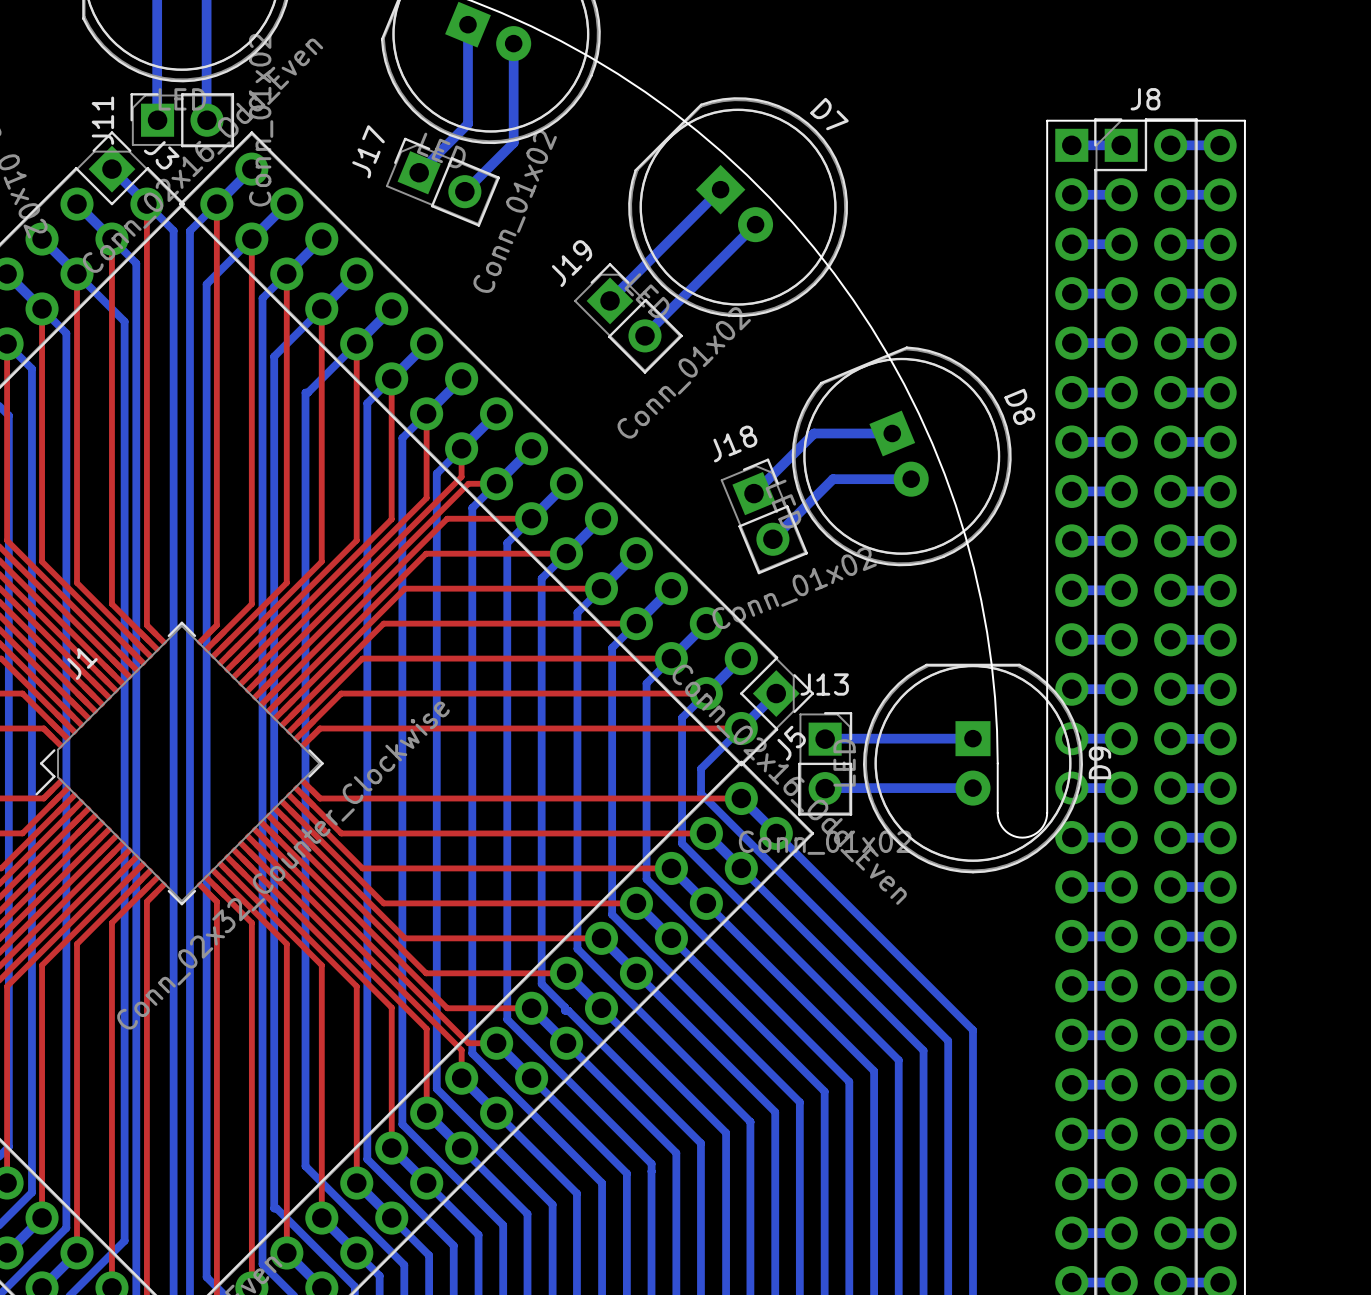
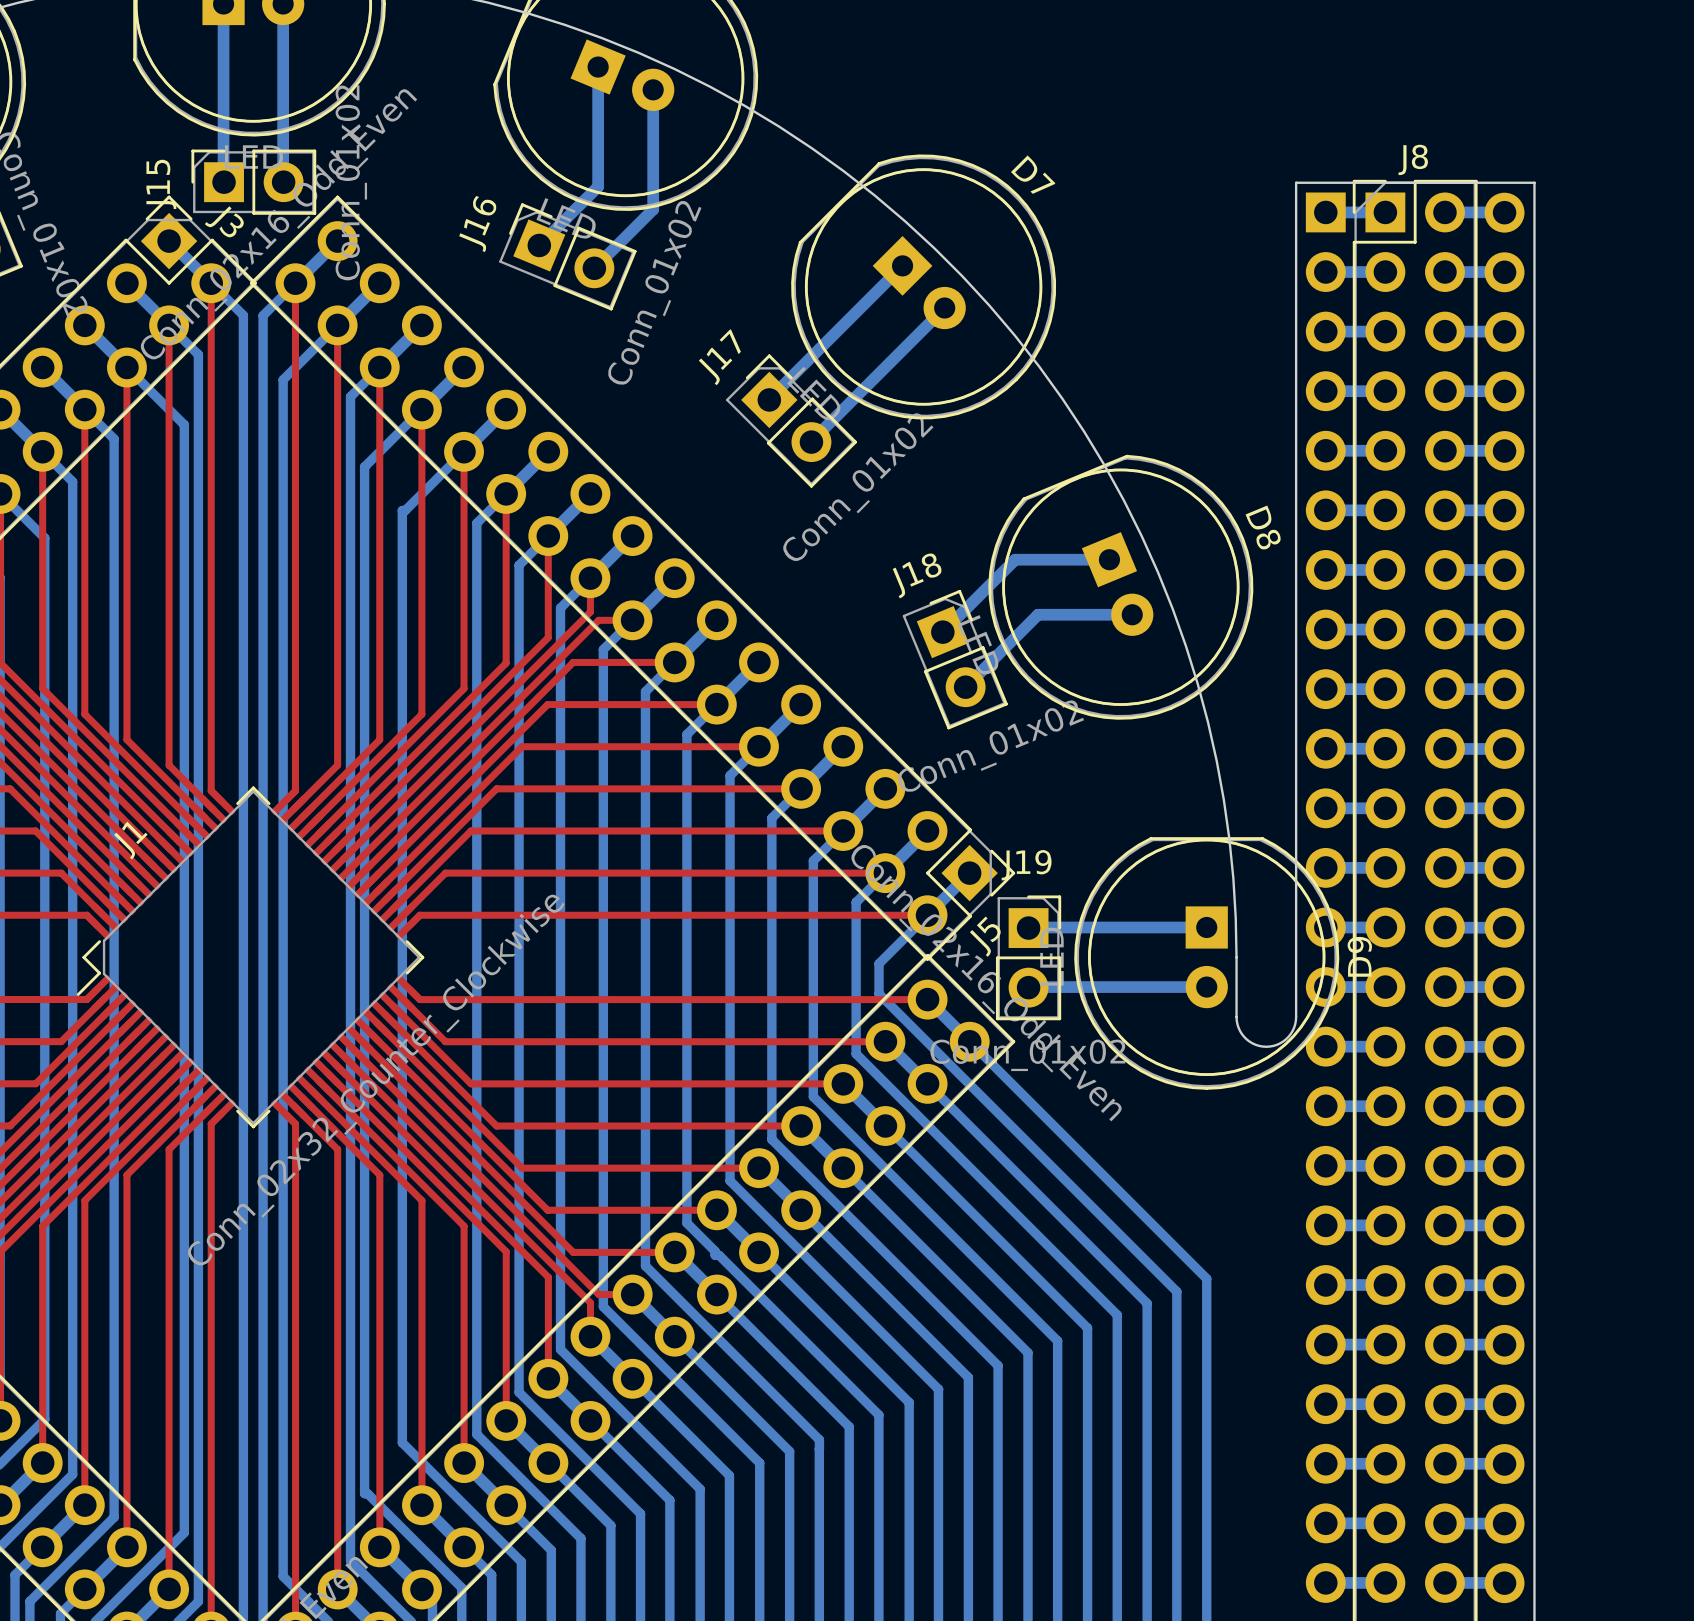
J11 name: J11 (102, 120) -> J15 (161, 184)
J17 name: J17 (368, 151) -> J16 (478, 224)
J19 name: J19 (572, 263) -> J17 (719, 357)
J13 name: J13 (824, 684) -> J19 (1026, 865)

